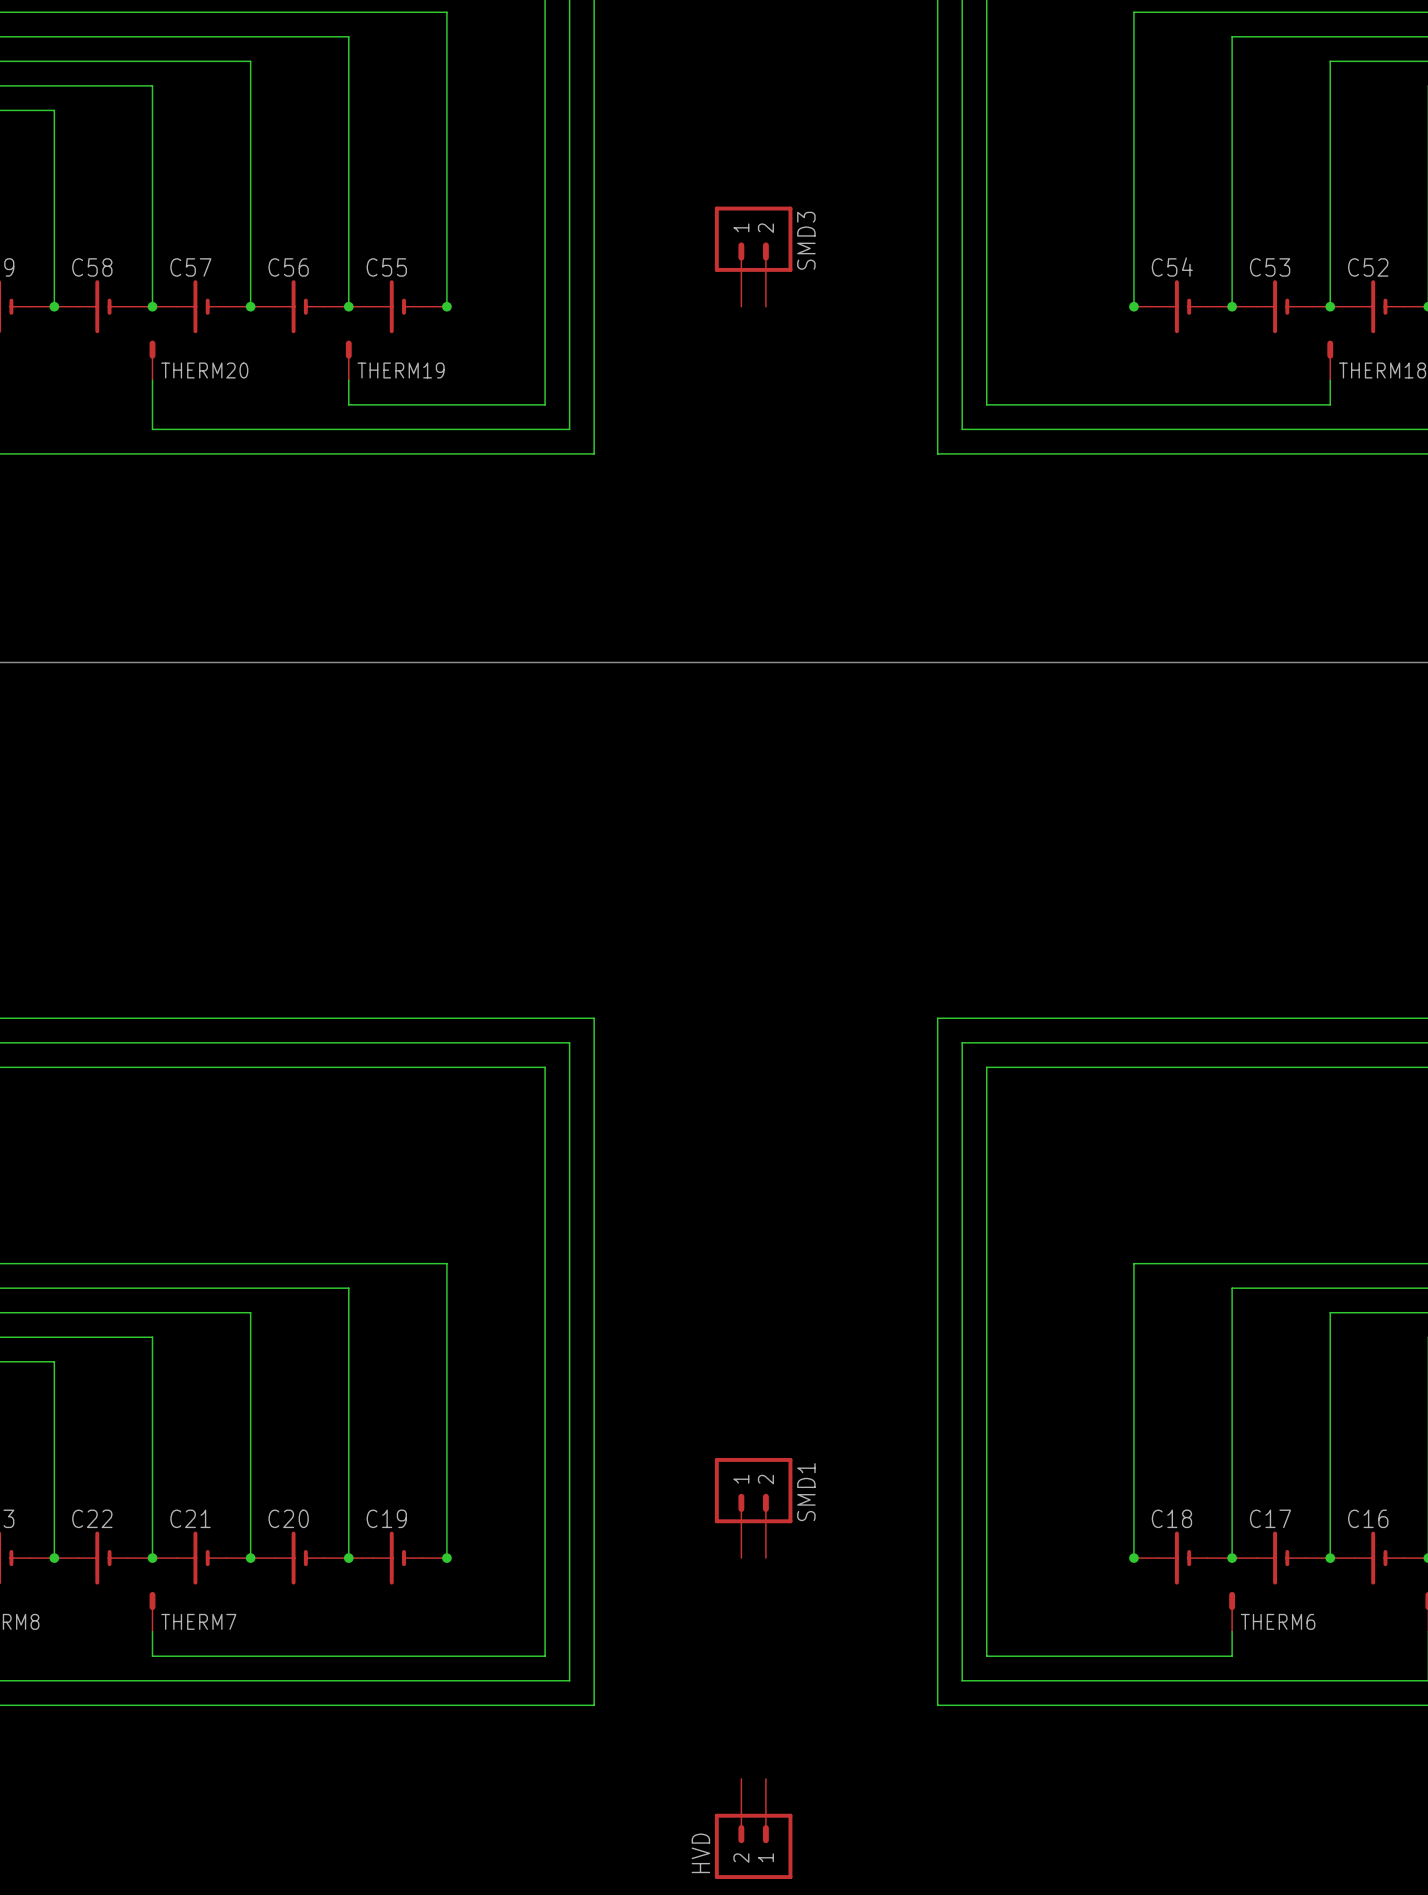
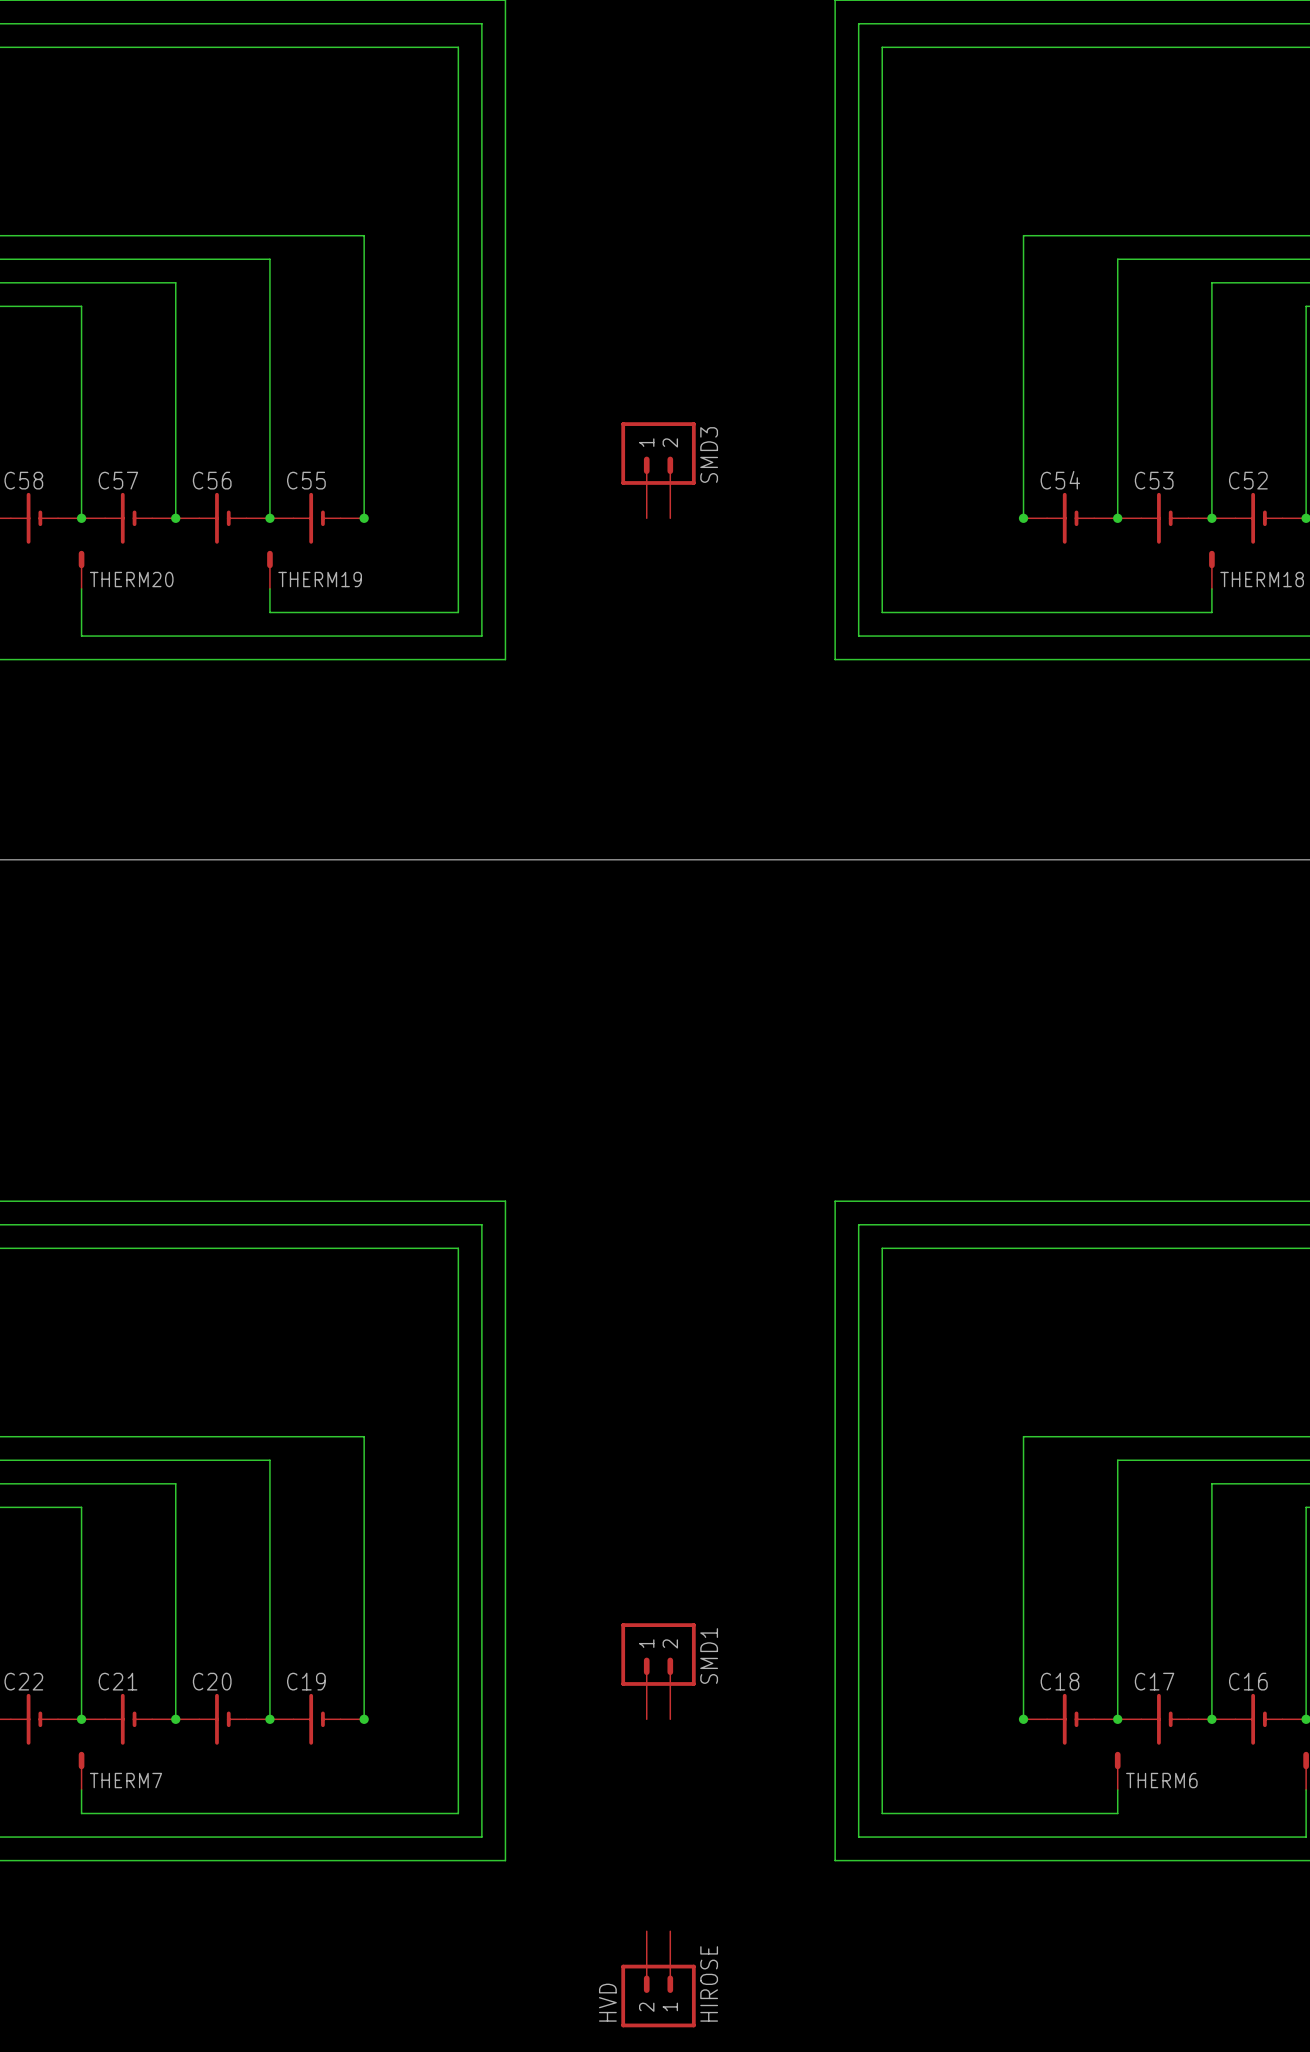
HVD value: none -> HIROSE (709, 1983)

